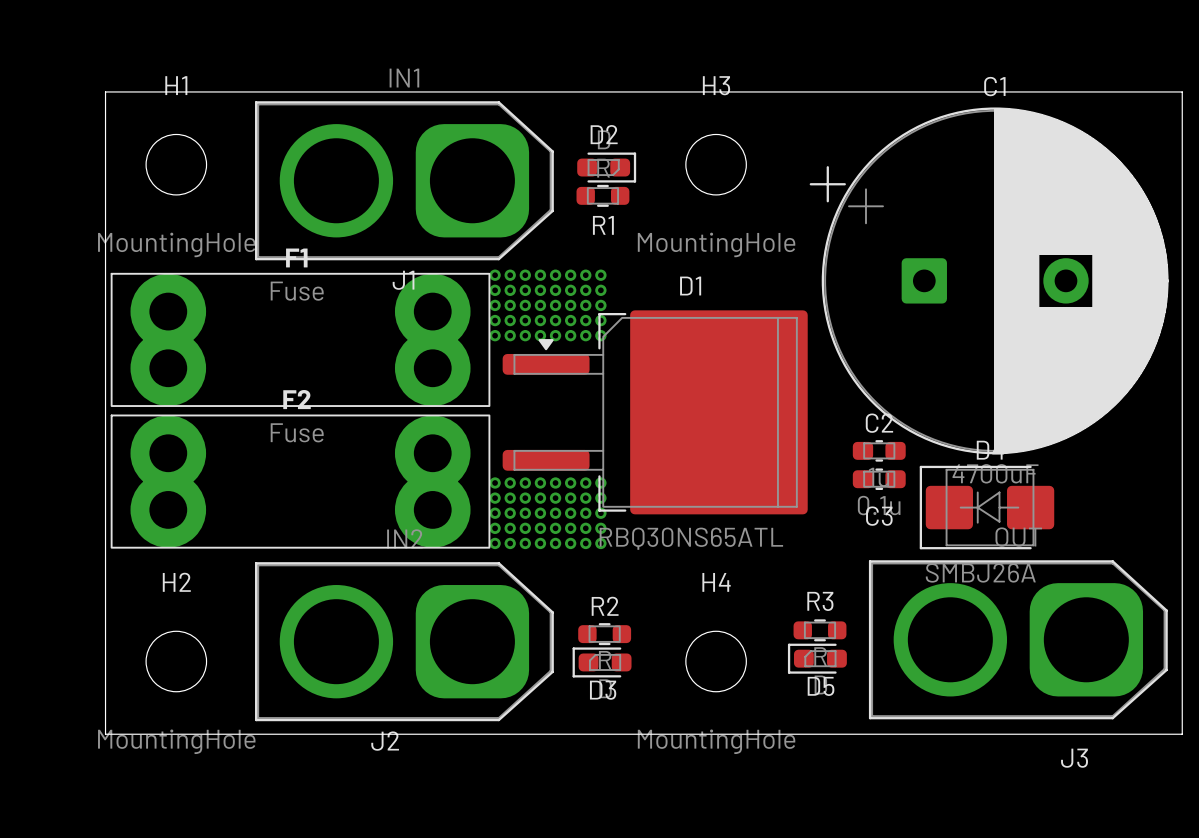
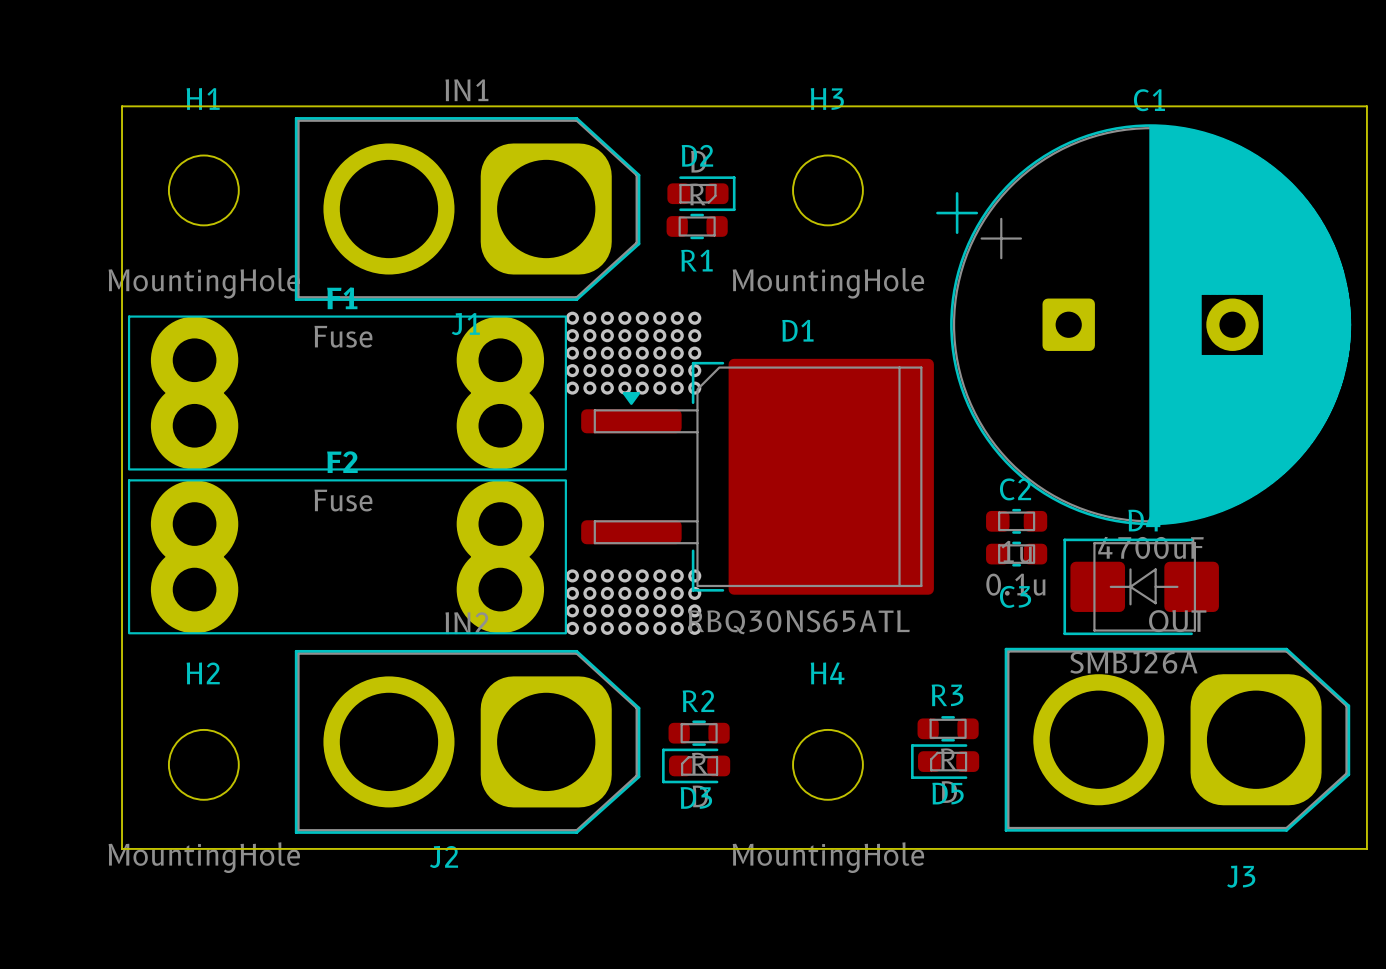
via: (495, 483) -> none
via: (510, 483) -> none
via: (525, 483) -> none
via: (540, 483) -> none
via: (555, 483) -> none
via: (570, 483) -> none
via: (585, 483) -> none
via: (600, 483) -> none

